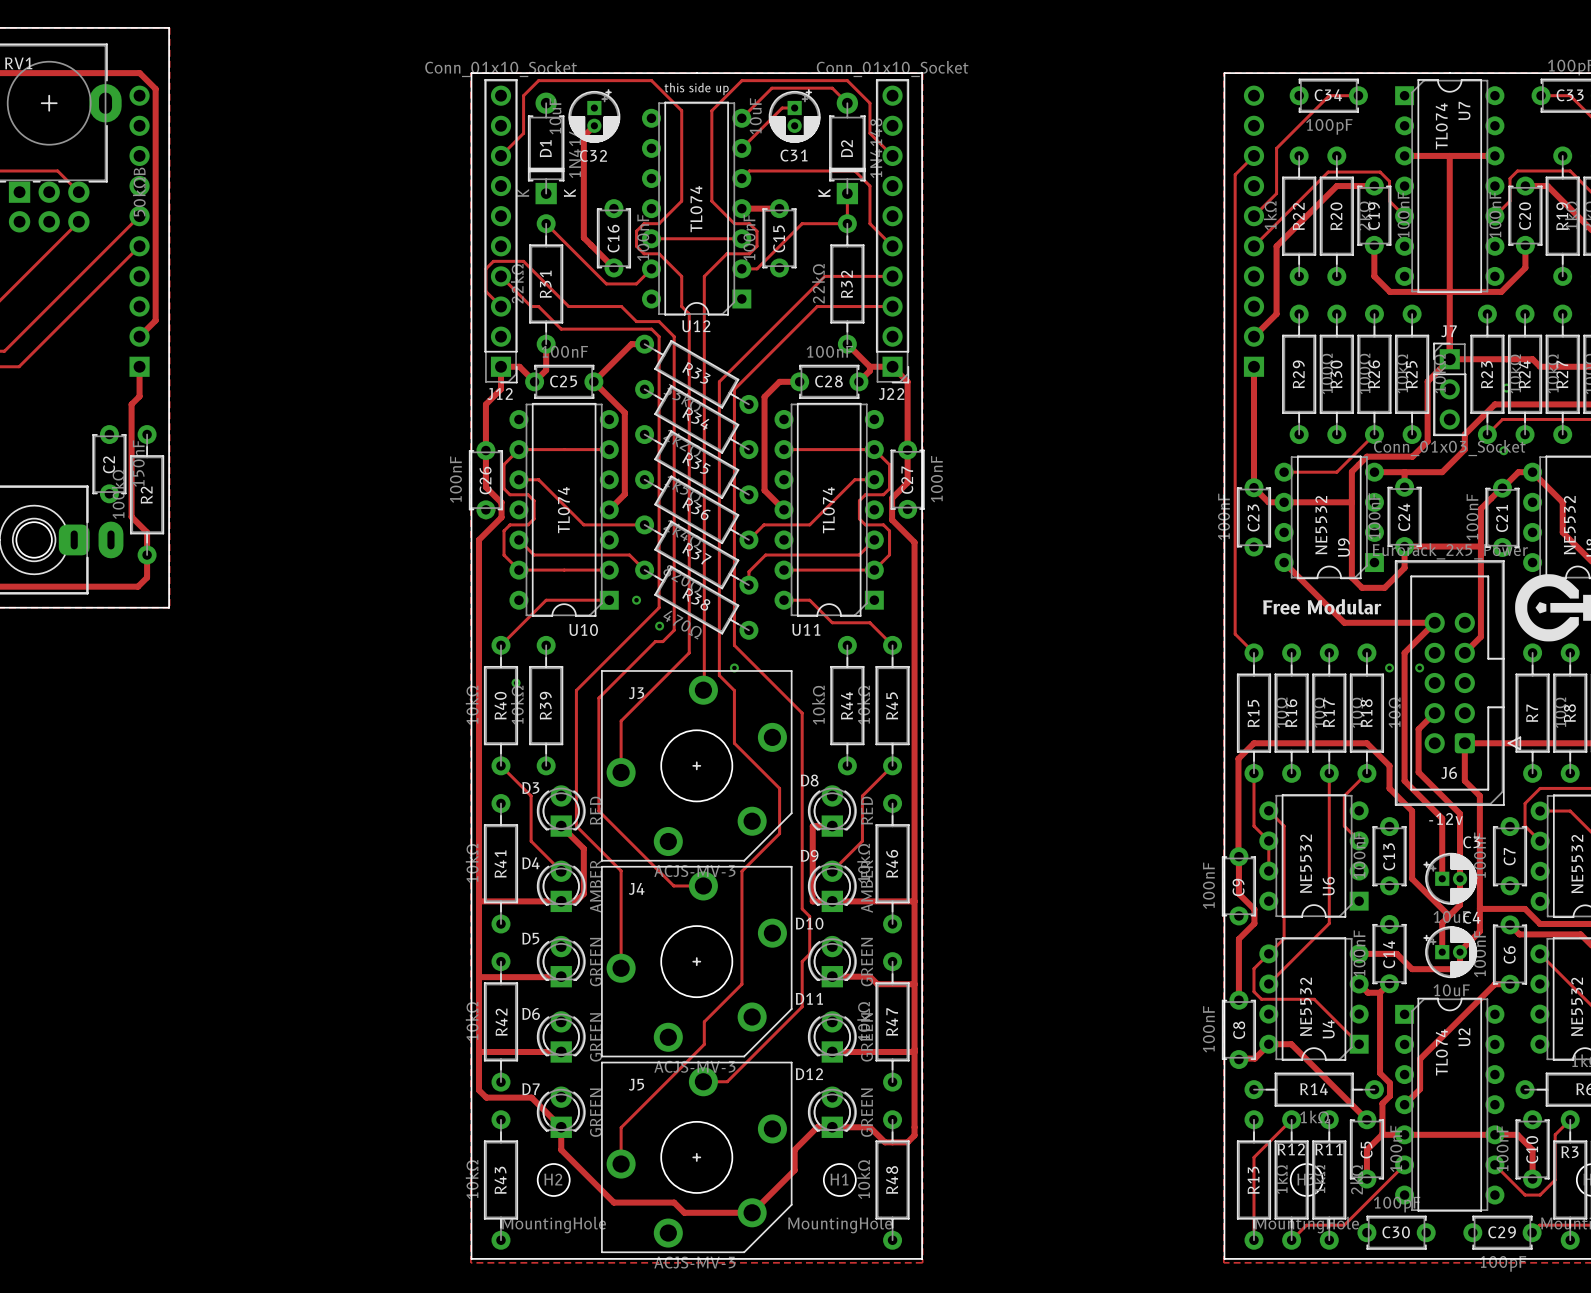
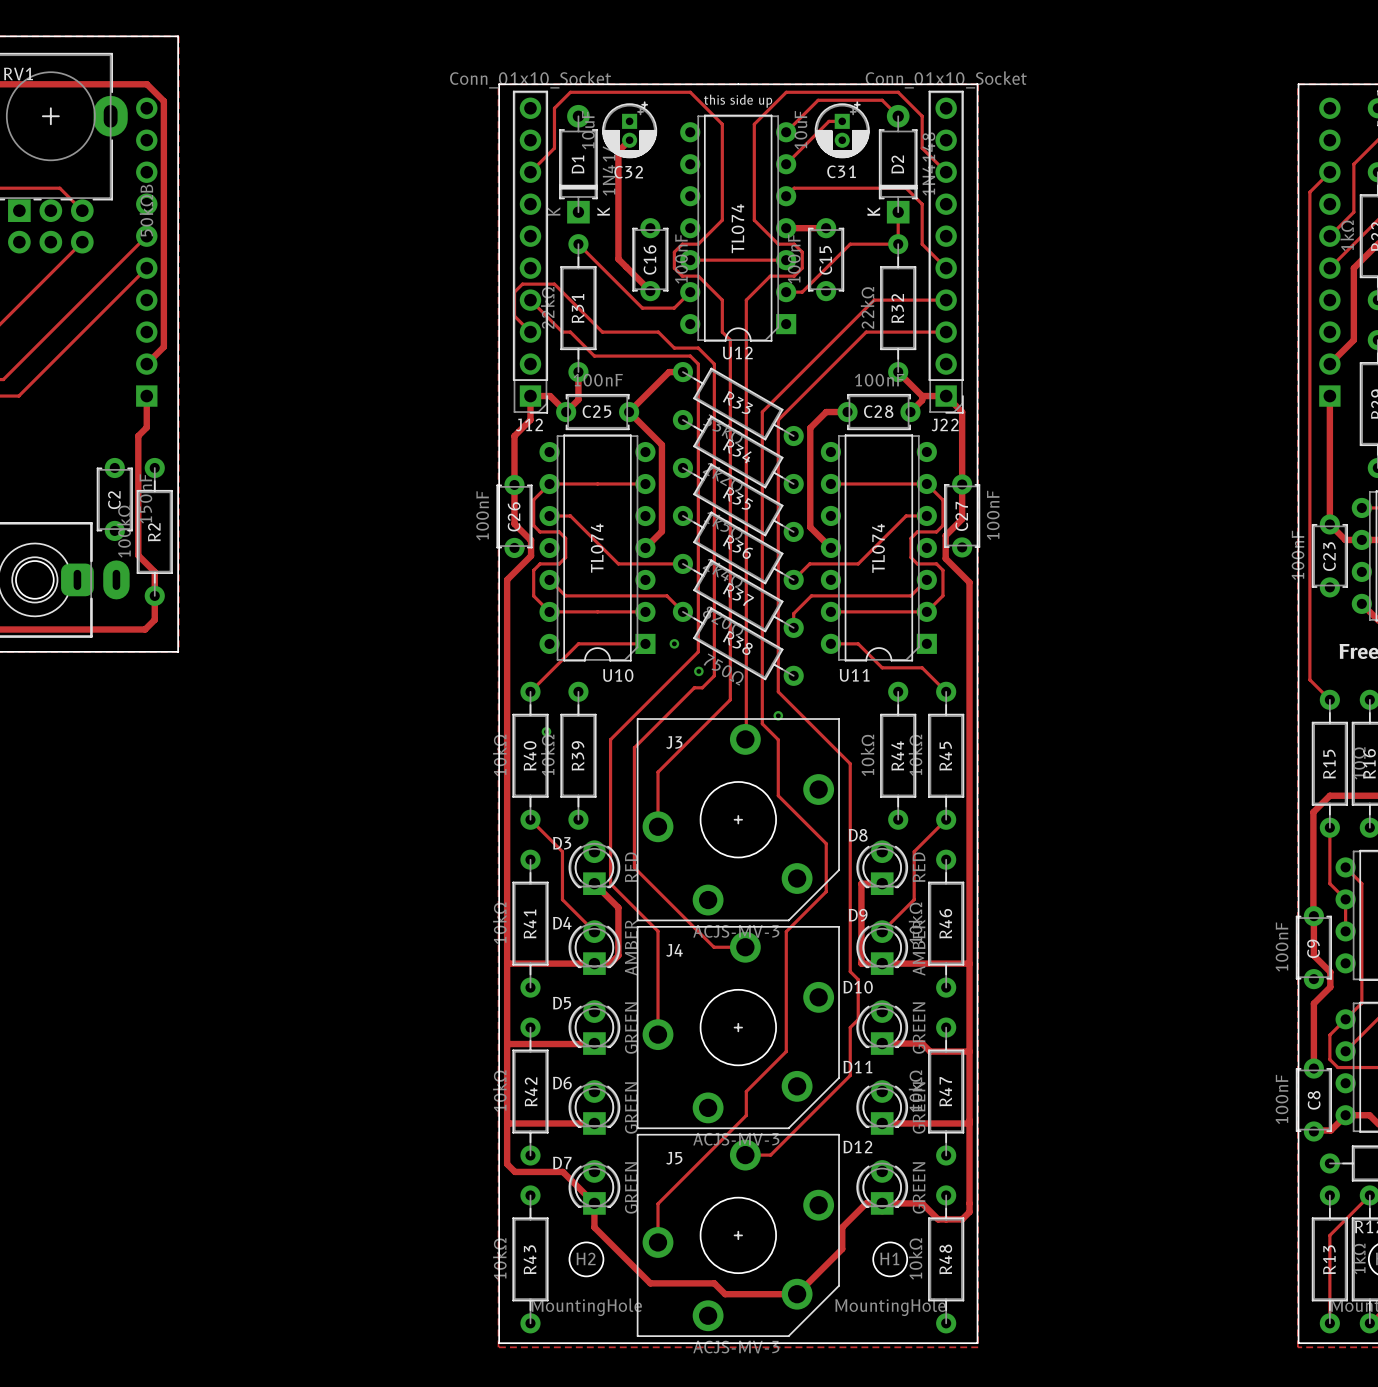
R38 value: 470Ω (682, 625) -> 750Ω (723, 669)

